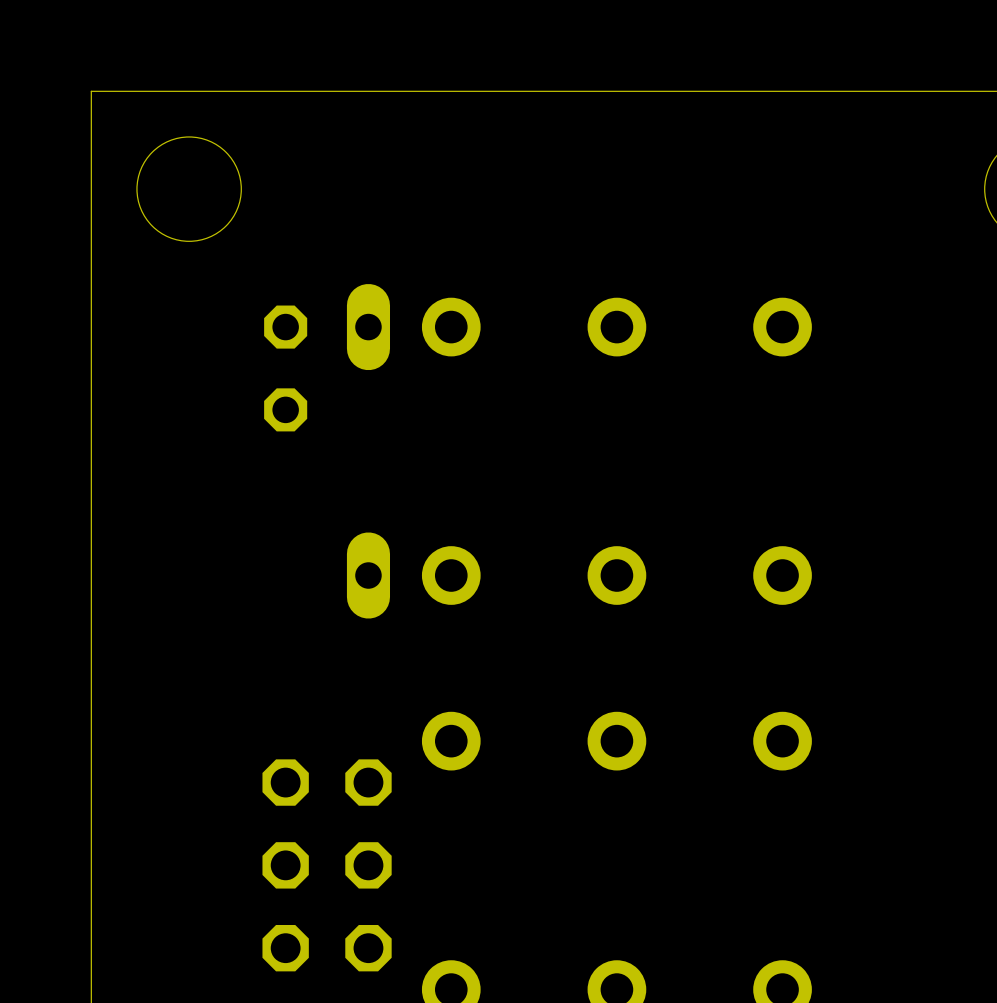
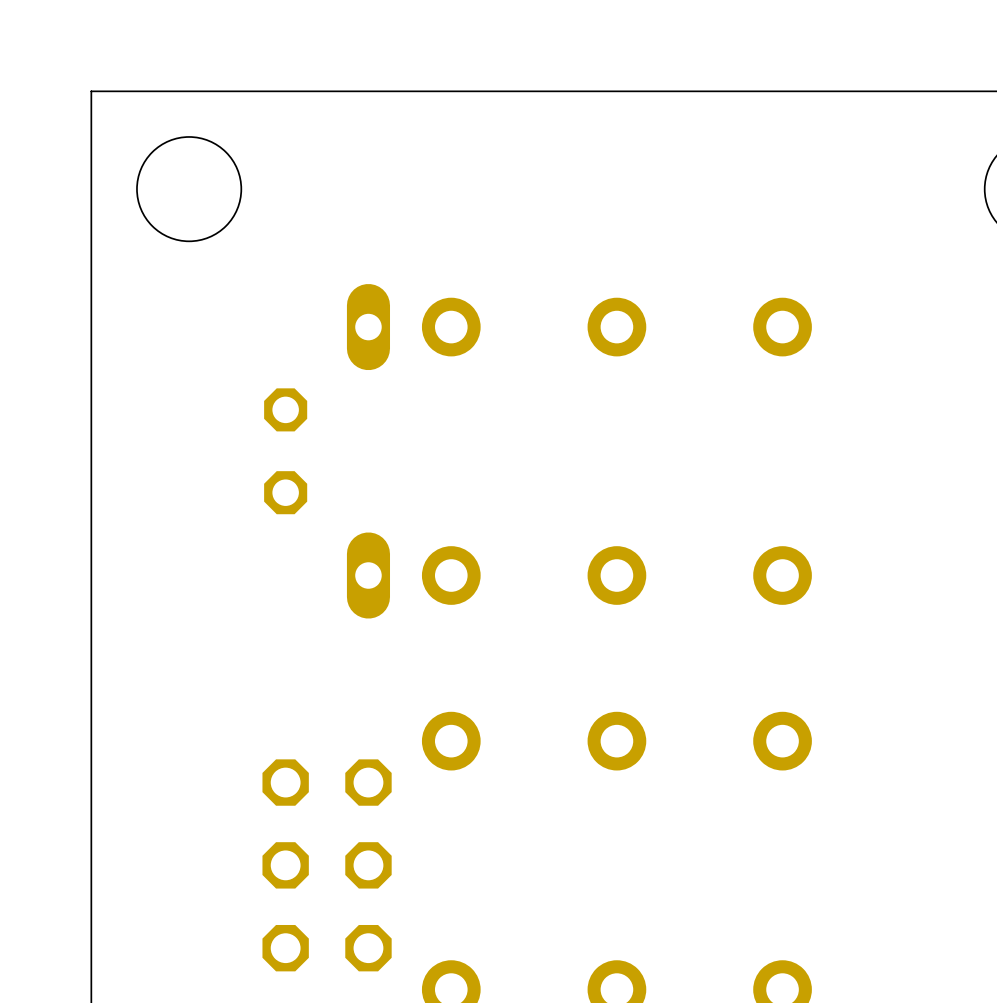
part position: (285, 368) -> (285, 451)

